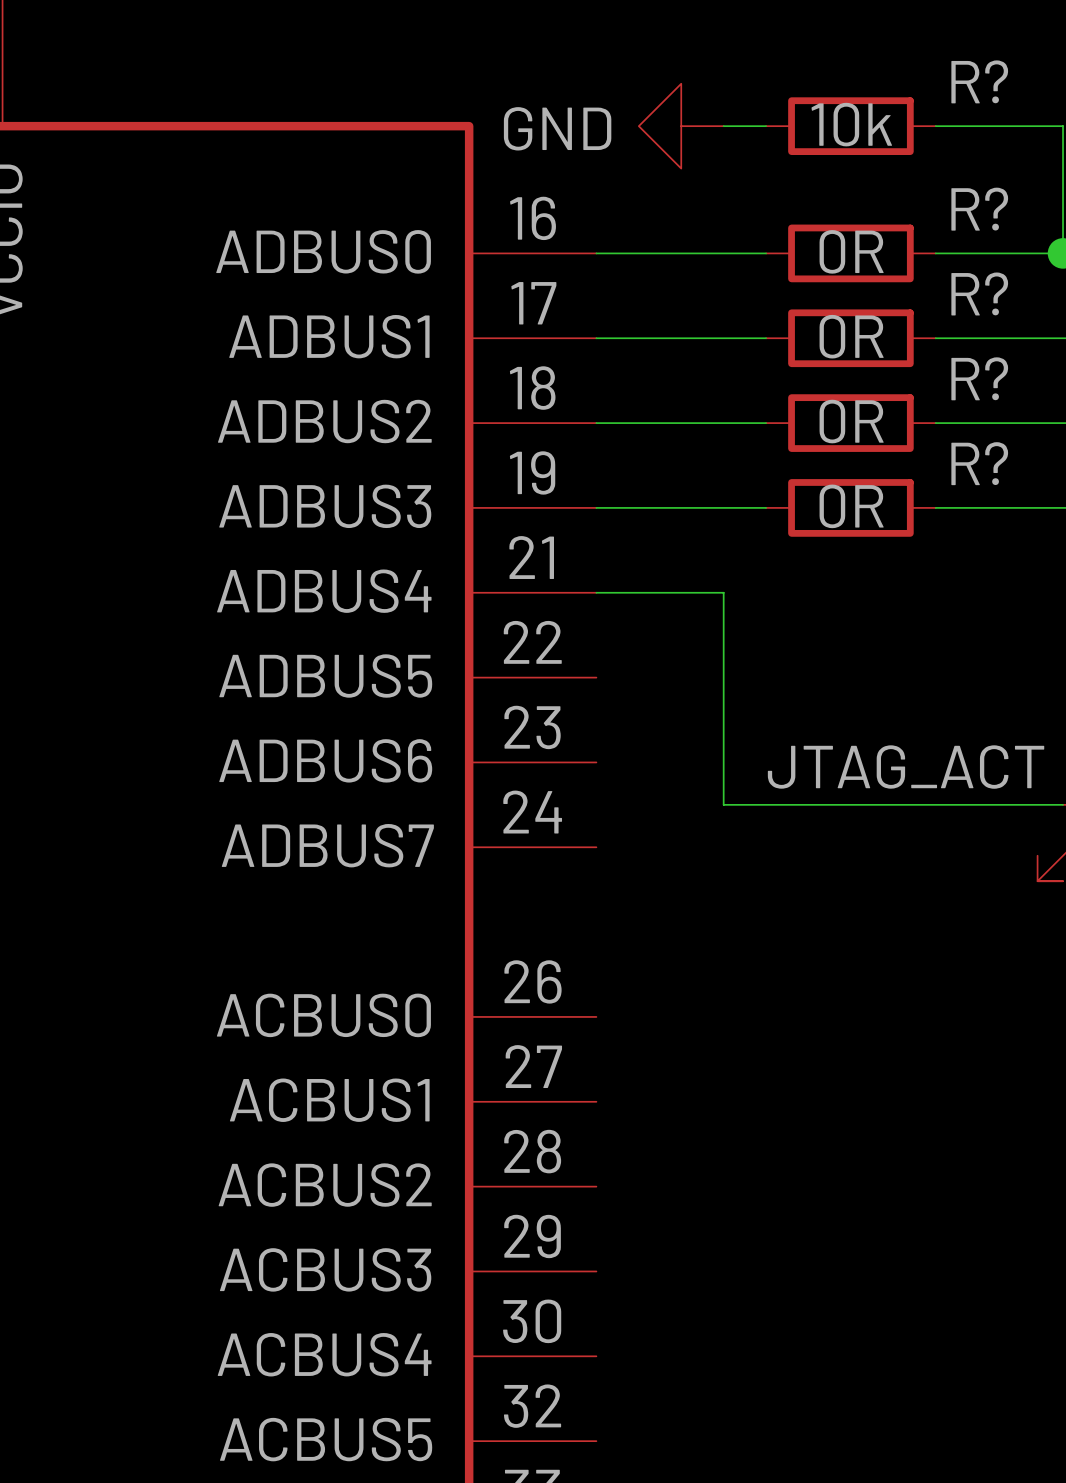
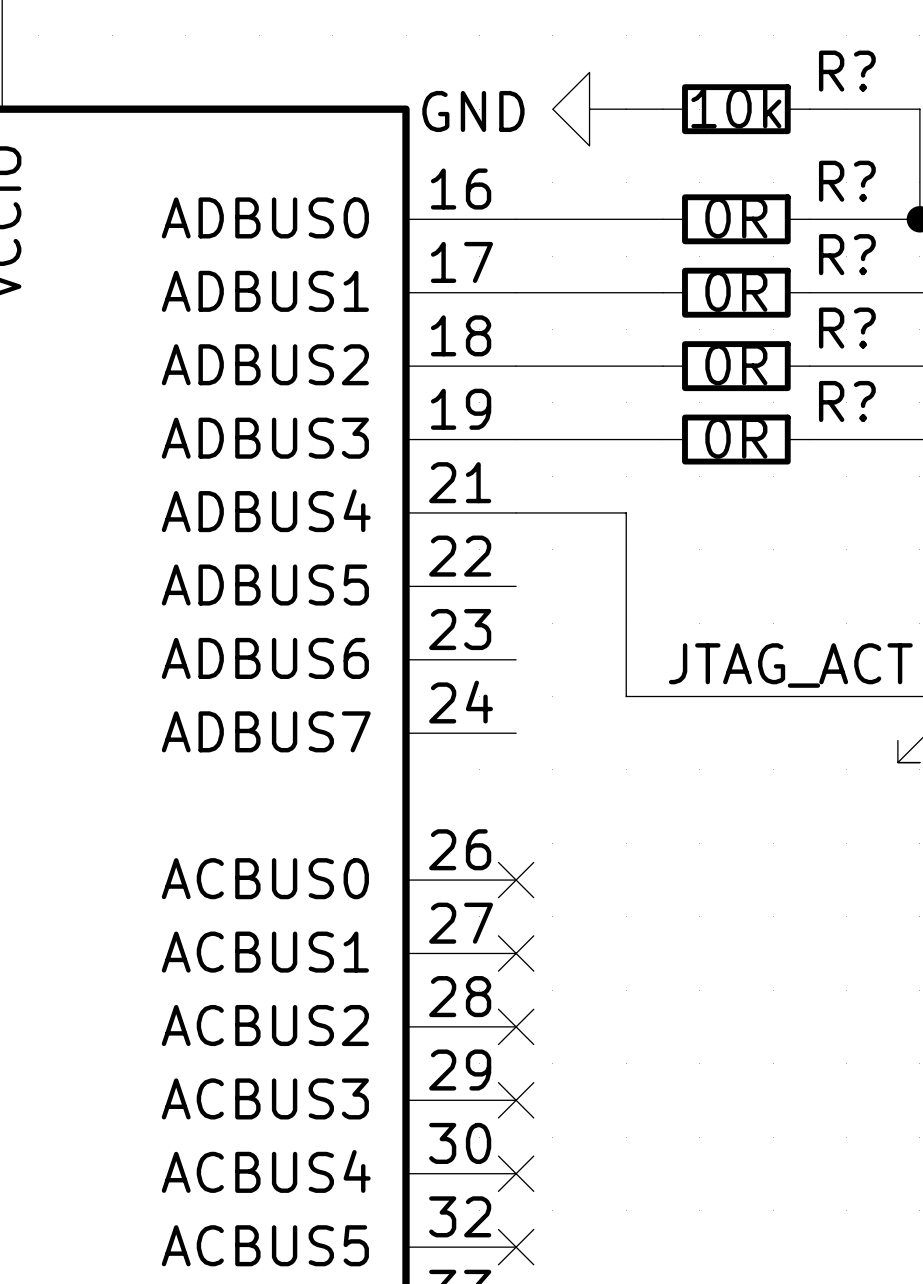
no-connect mark: none -> (516, 880)
no-connect mark: none -> (516, 953)
no-connect mark: none -> (516, 1026)
no-connect mark: none -> (516, 1100)
no-connect mark: none -> (516, 1173)
no-connect mark: none -> (516, 1247)

